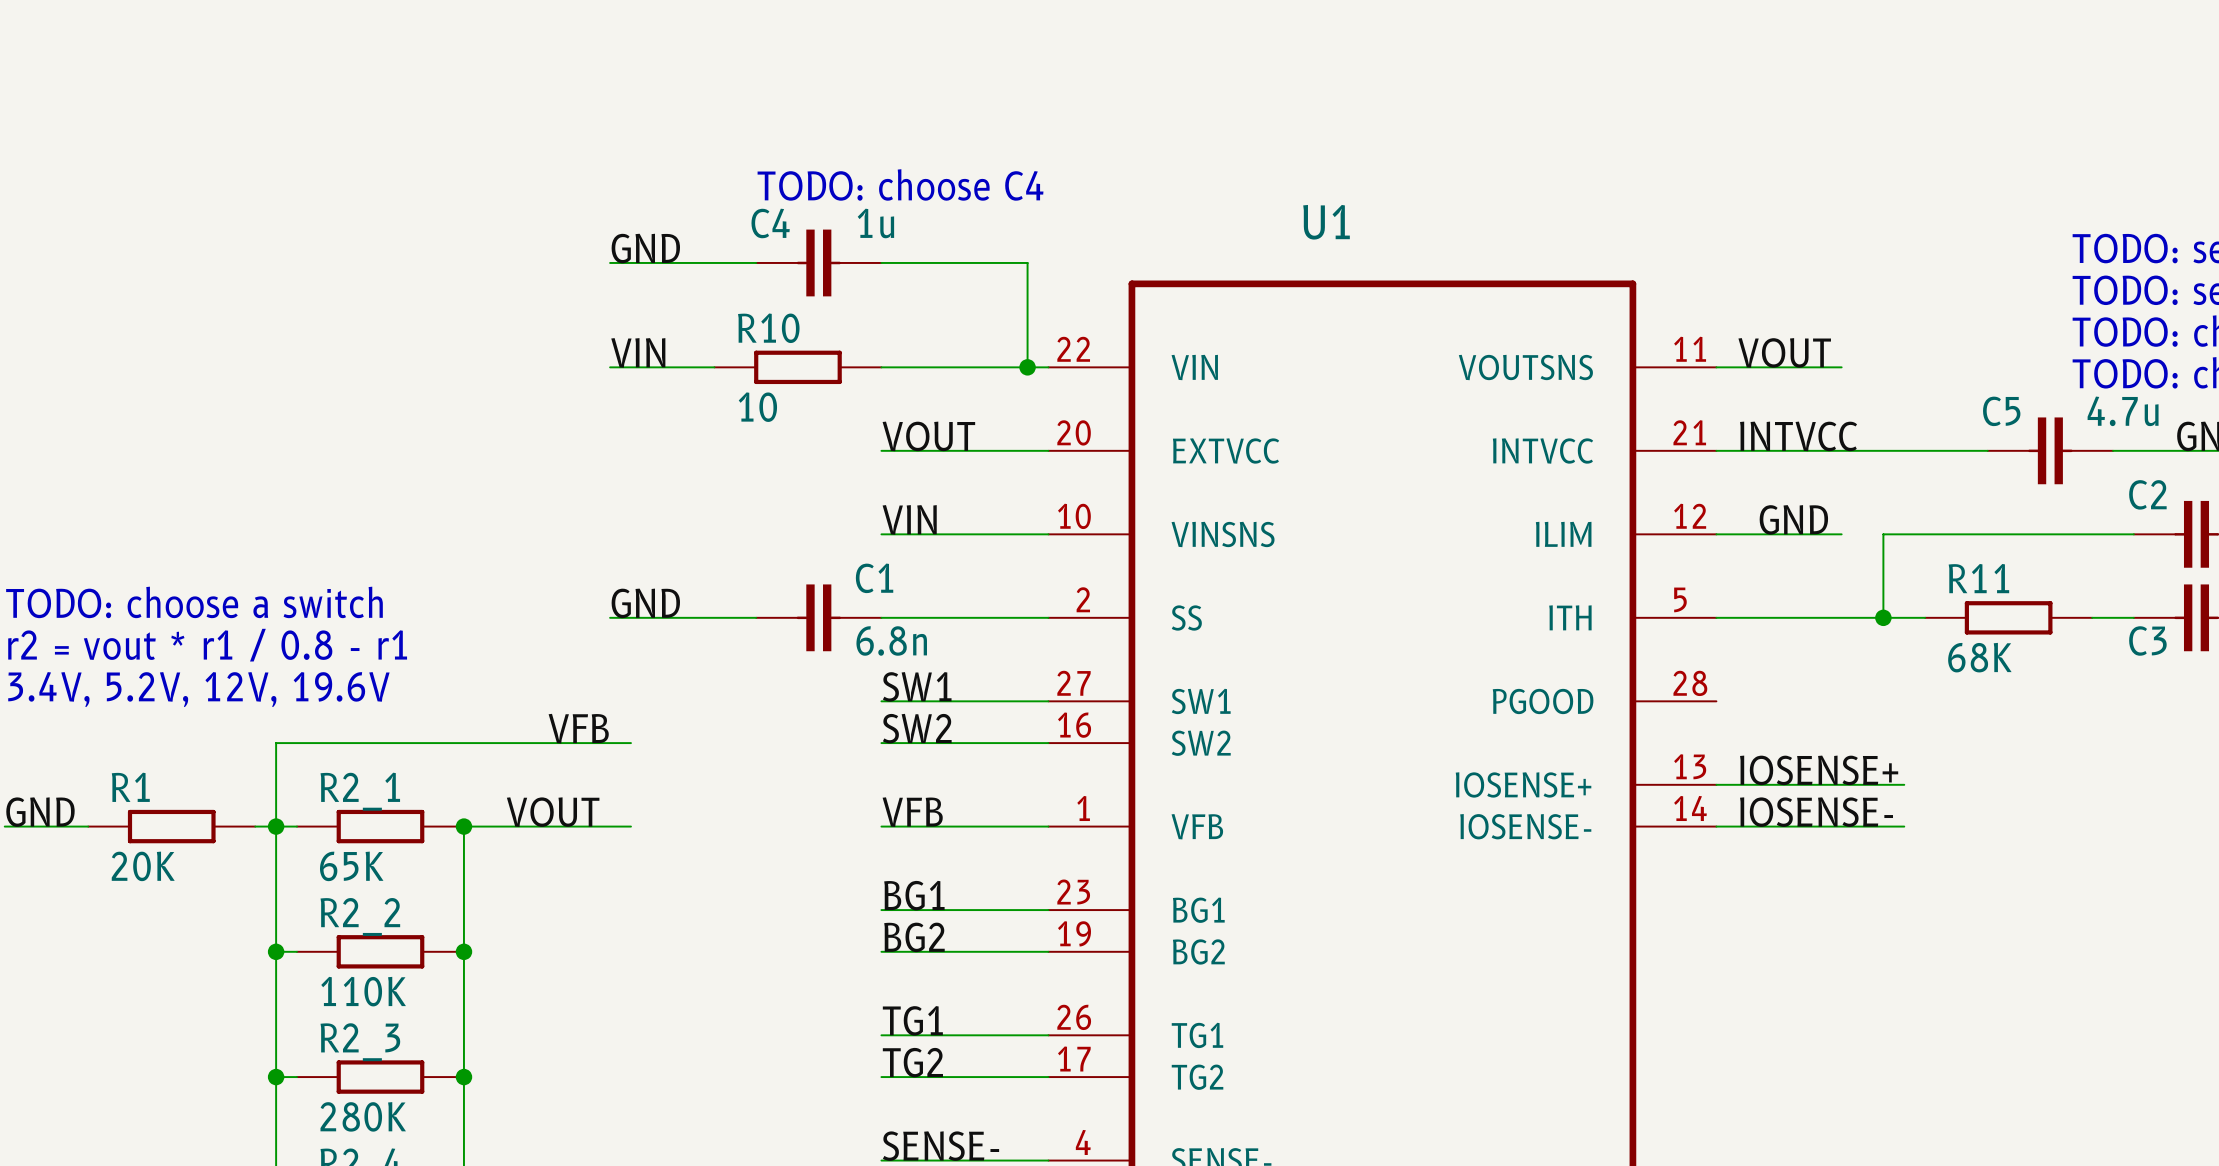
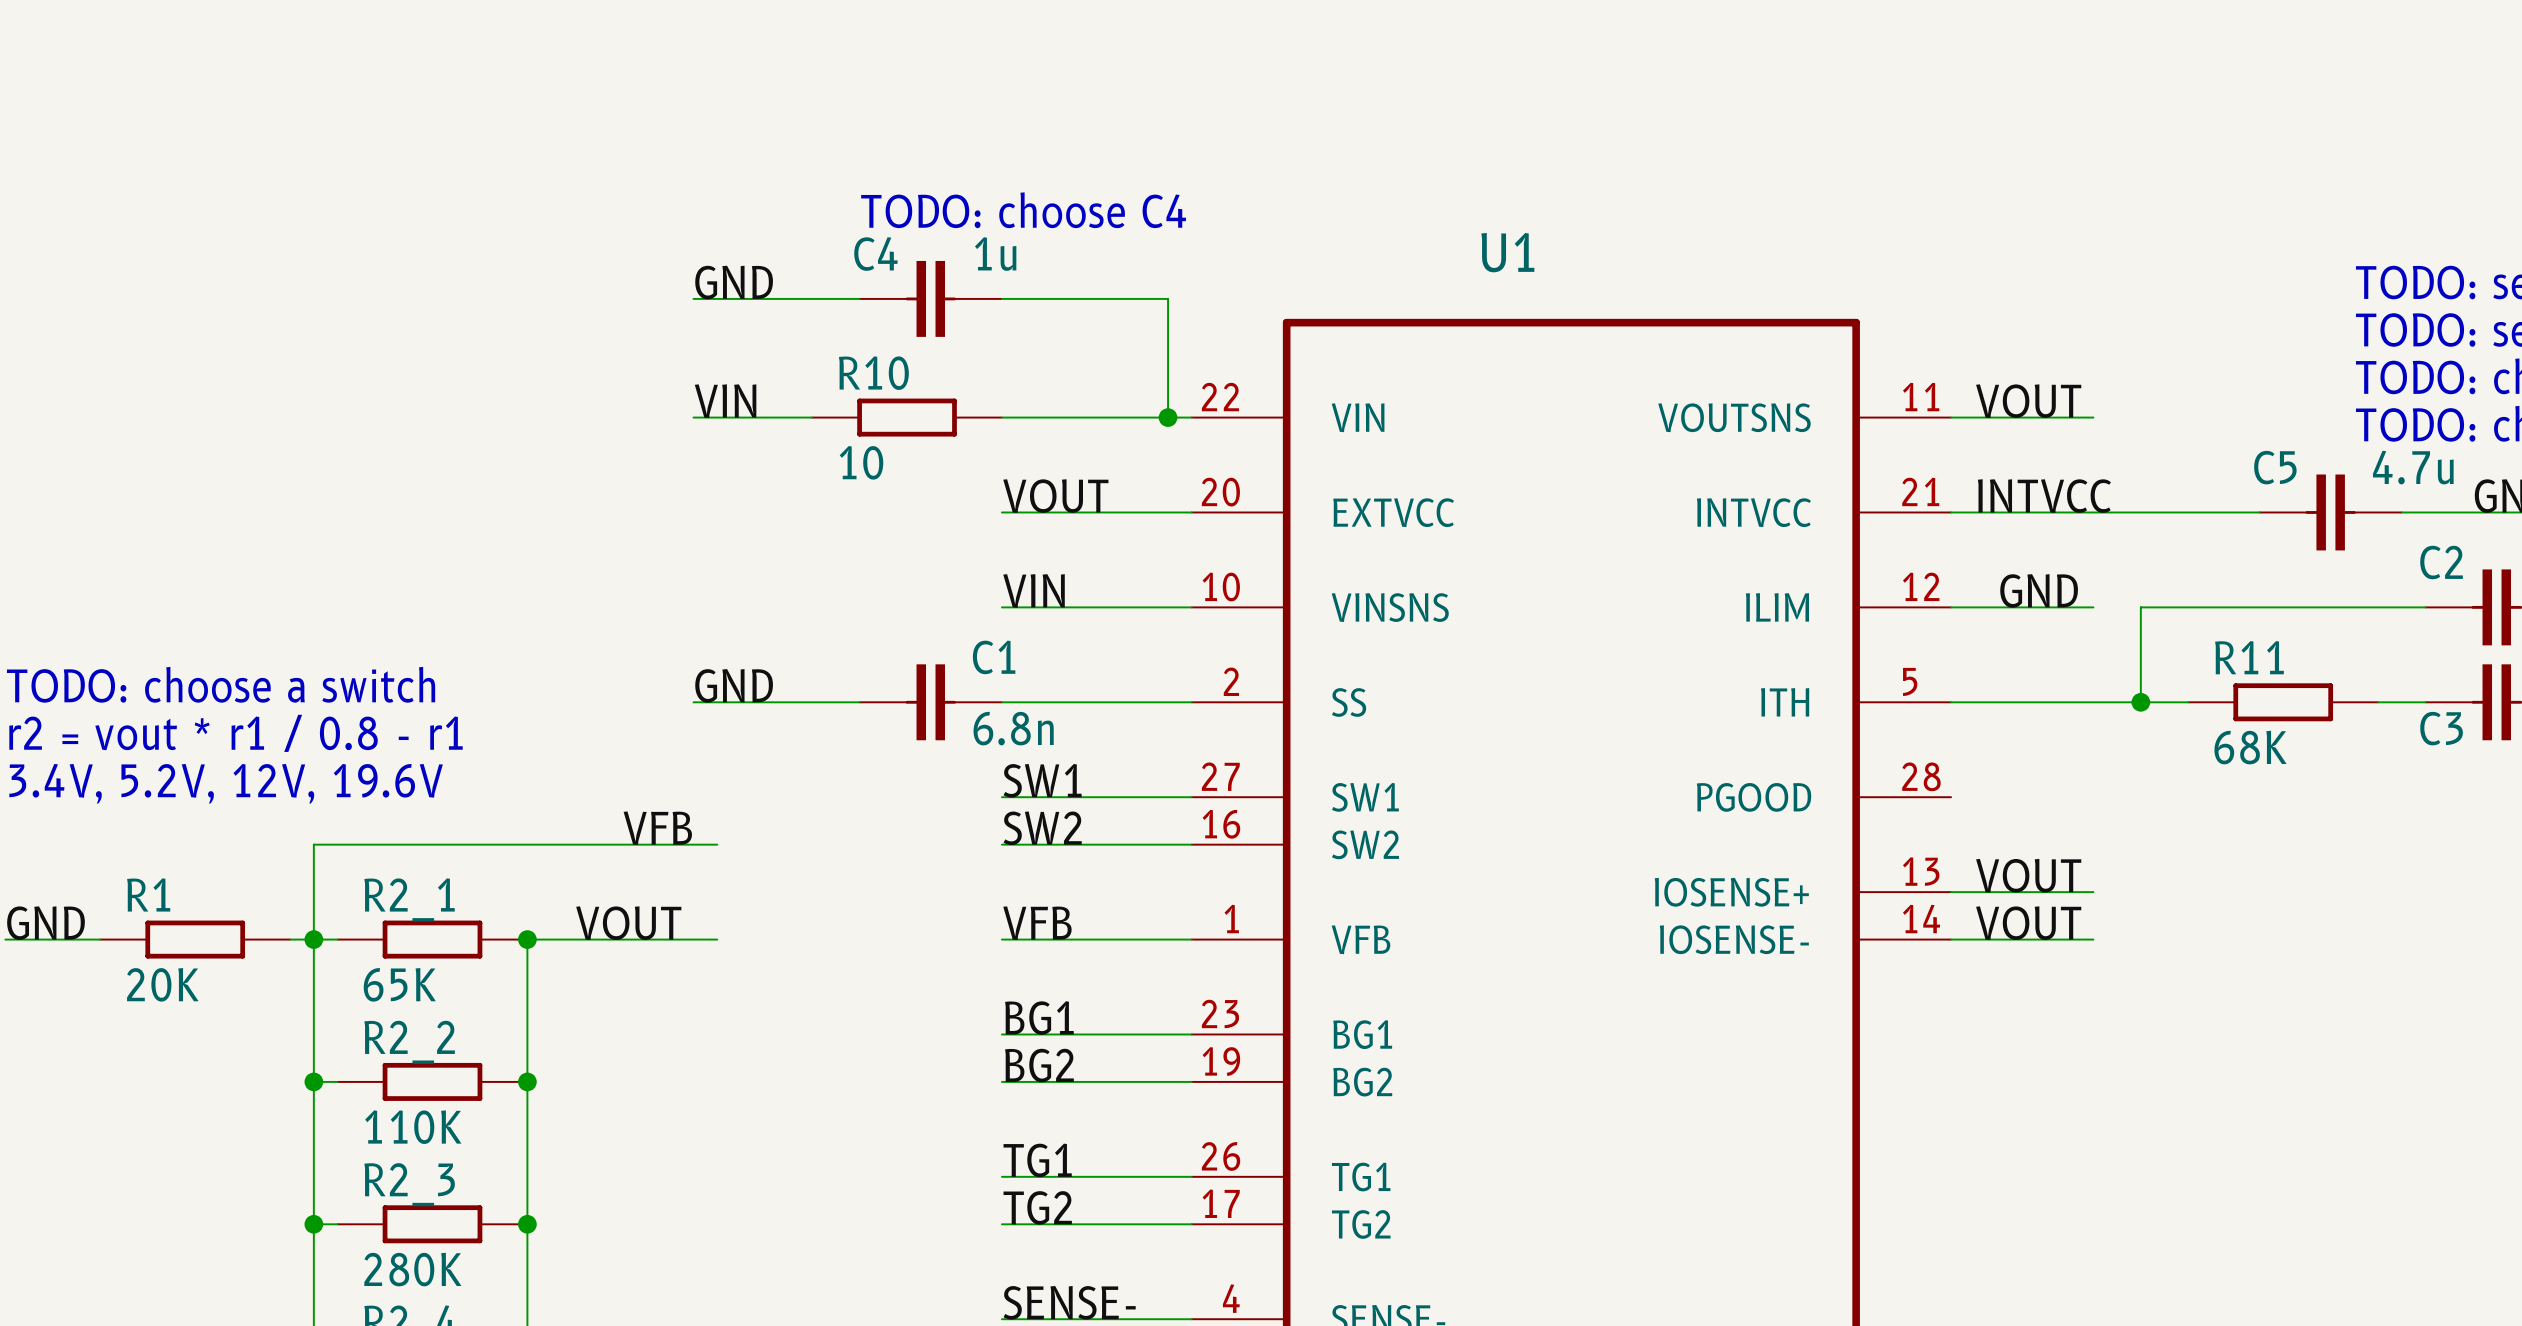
label: IOSENSE+ (1819, 770) -> VOUT (2028, 875)
wire: (1841, 784) (1904, 784) -> none
label: IOSENSE- (1816, 812) -> VOUT (2028, 923)
wire: (1841, 826) (1904, 826) -> none

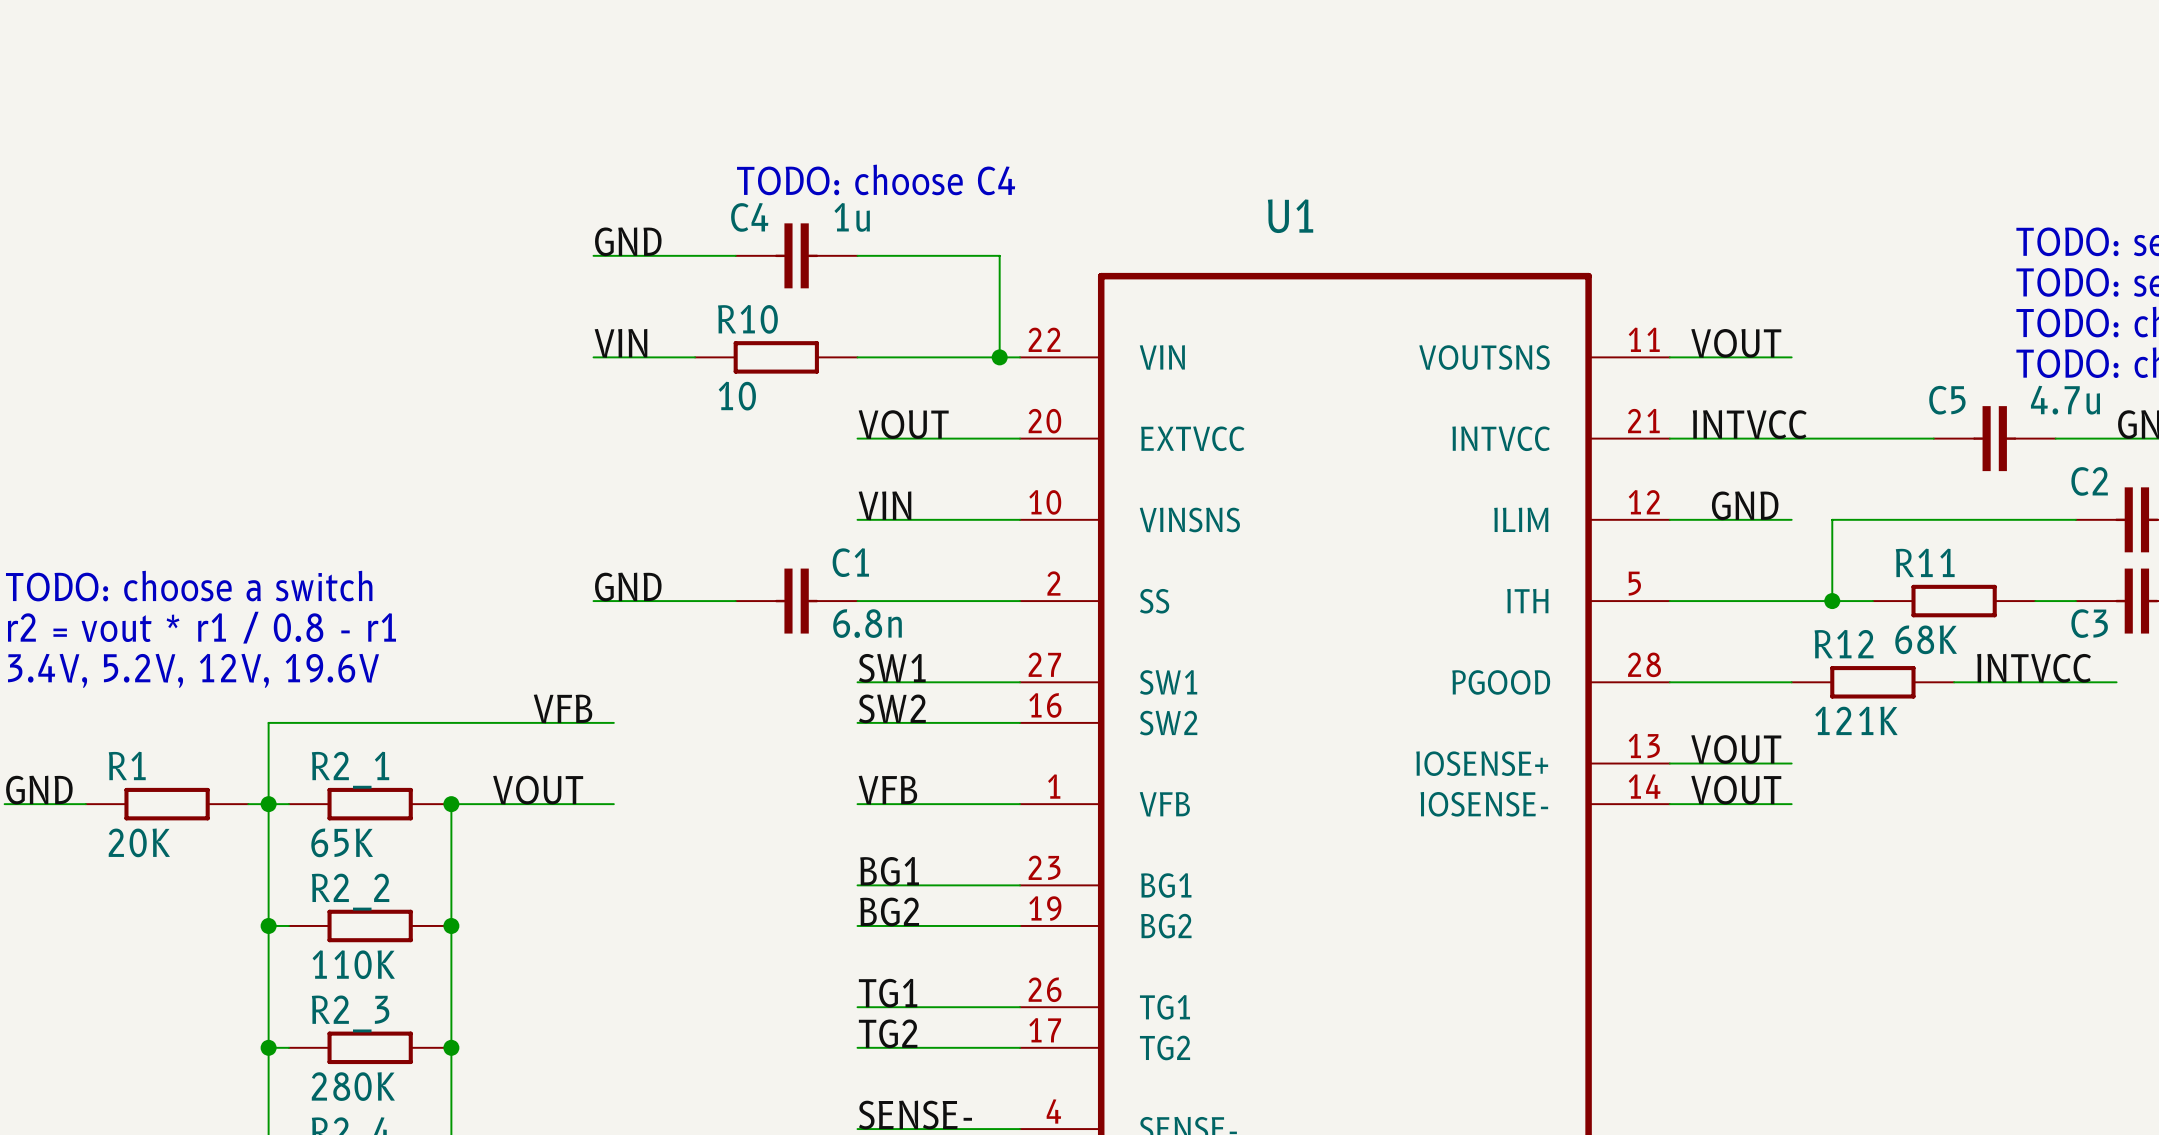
label: none -> INTVCC (2034, 668)
wire: none -> (1669, 682) (1791, 682)
R12: none -> 121K (1872, 682)
wire: none -> (1954, 682) (2116, 682)

